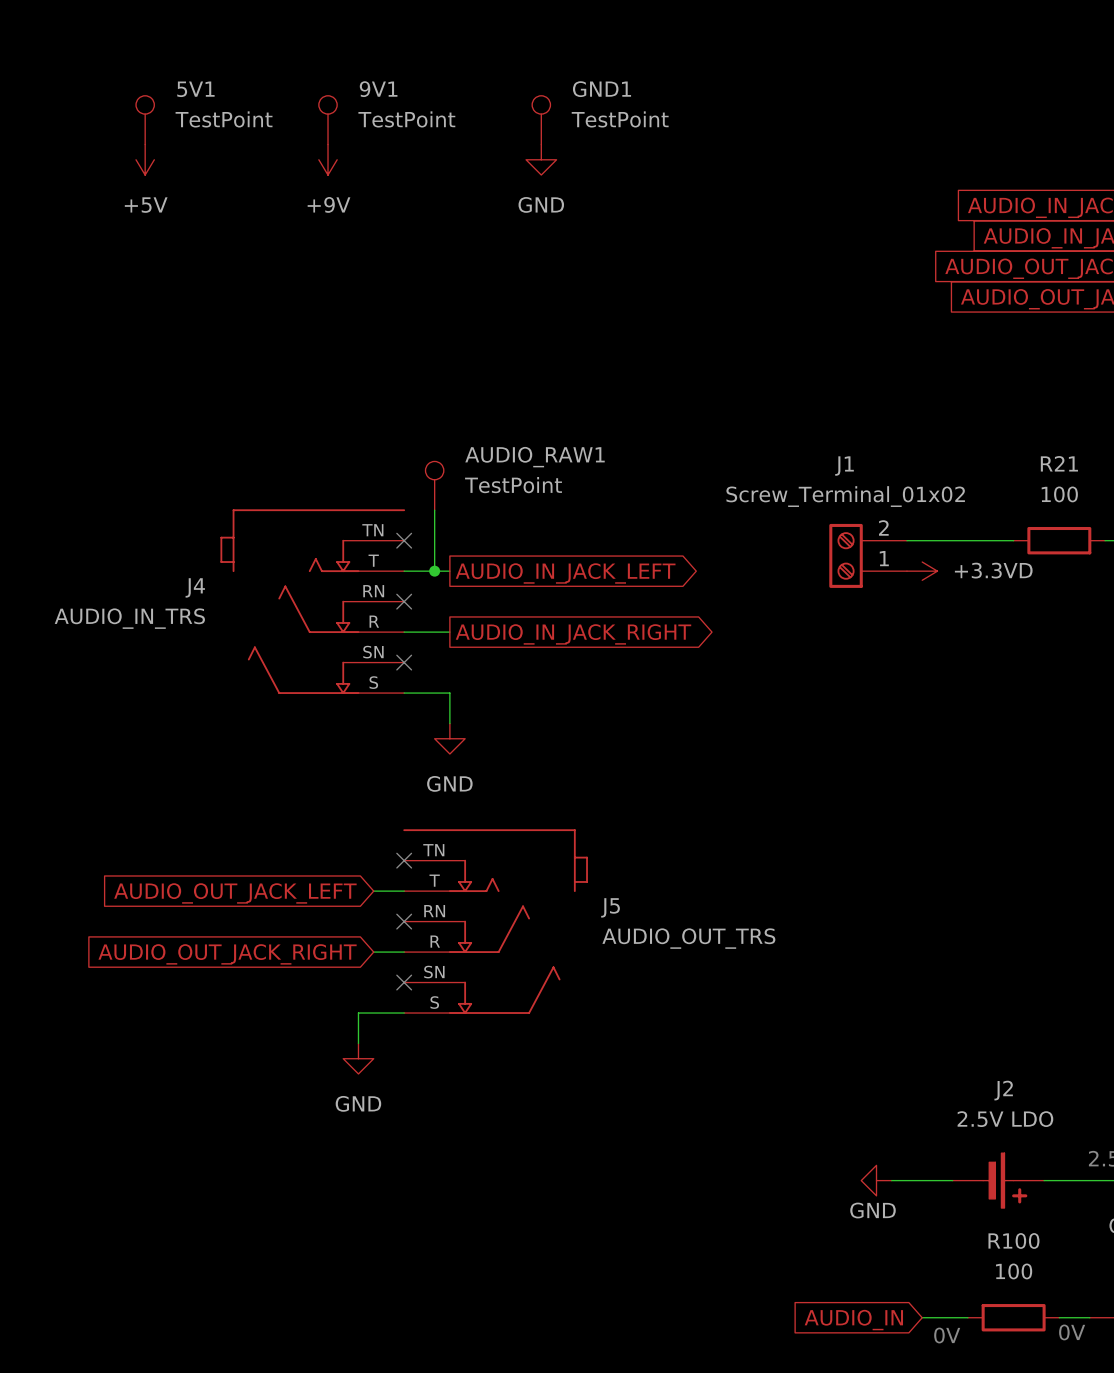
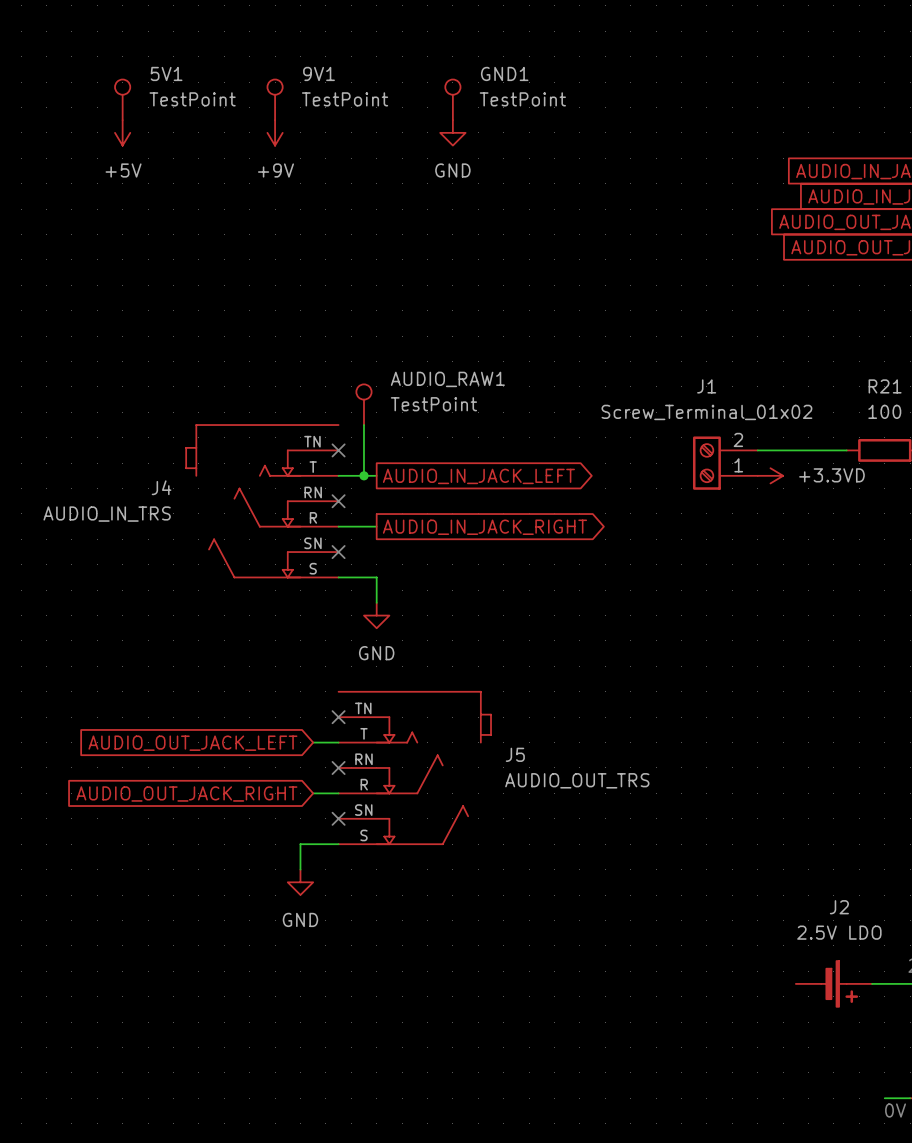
power symbol: GND (876, 1180) -> none
wire: (891, 1180) (952, 1180) -> none
wire: (922, 1317) (967, 1317) -> none
R100: 100 (1013, 1317) -> none
global label: AUDIO_IN (853, 1320) -> none
text: 0V (947, 1335) -> none

